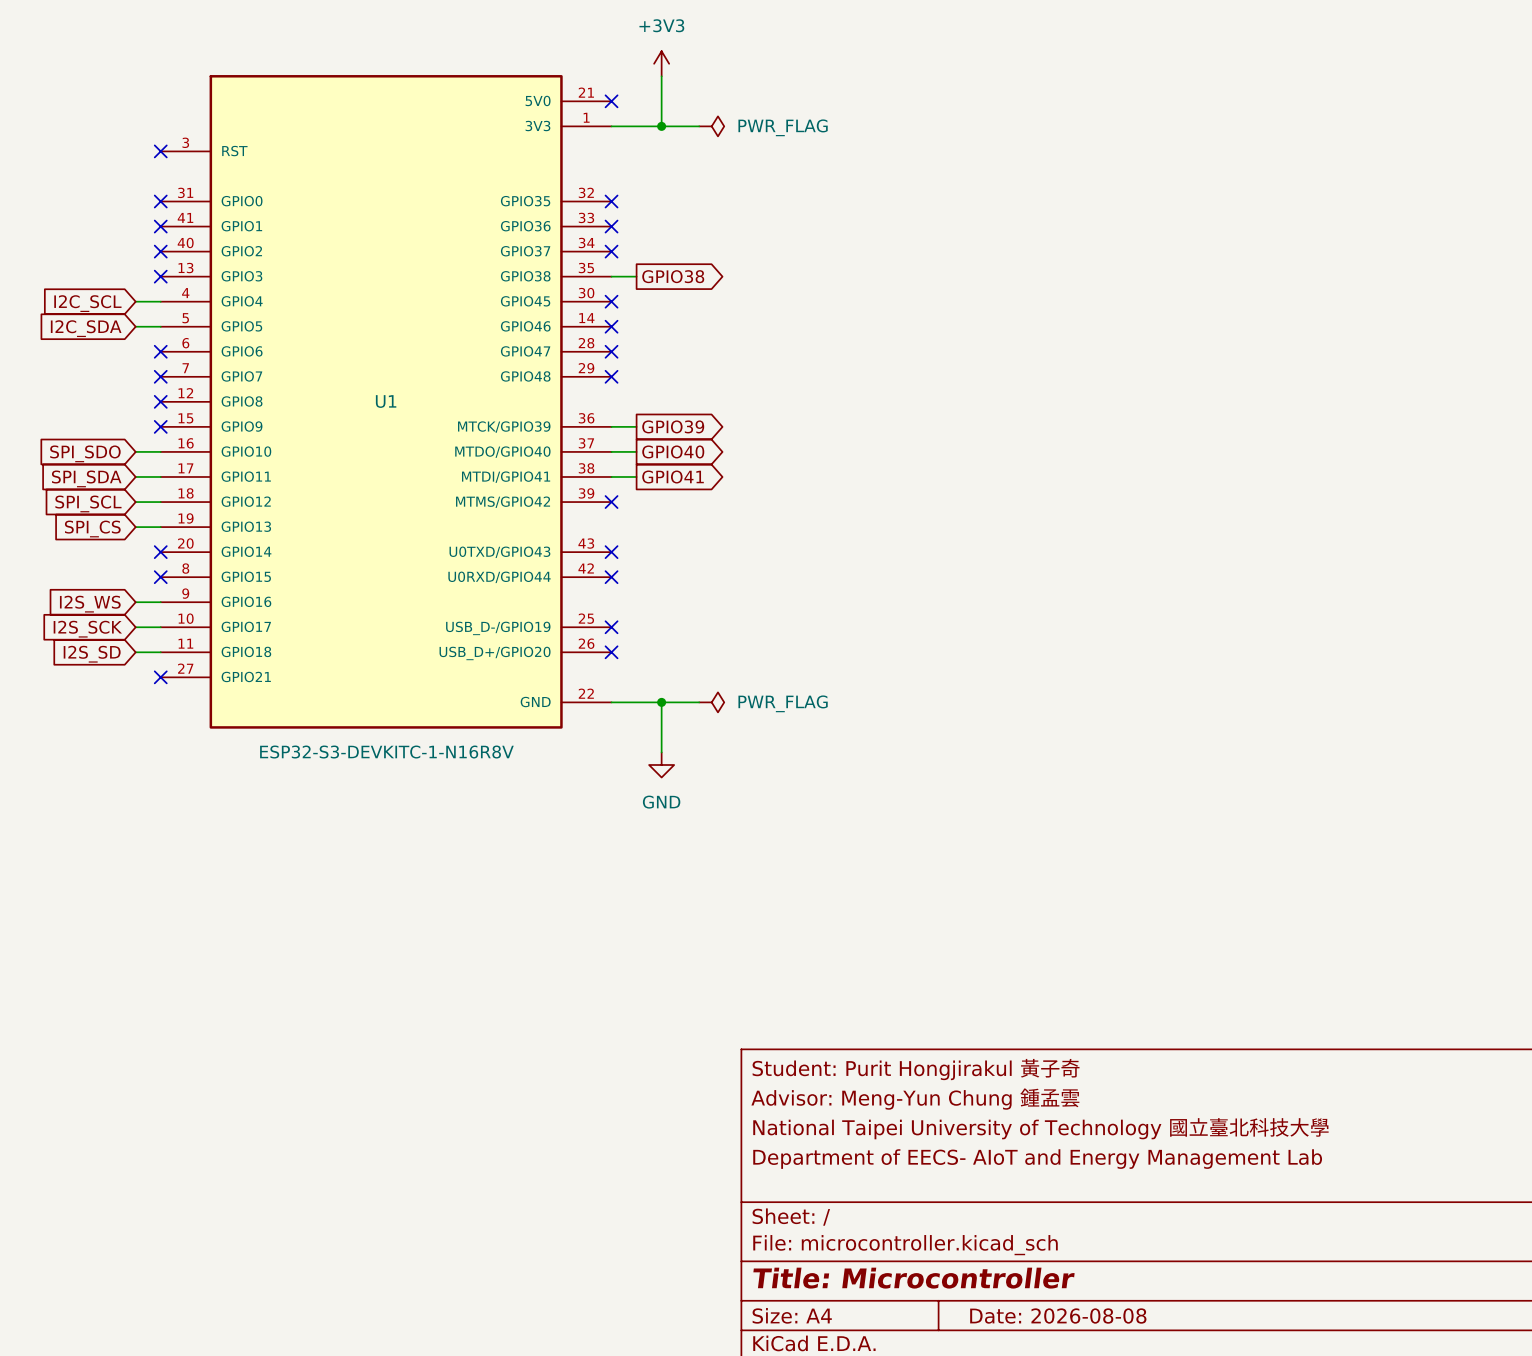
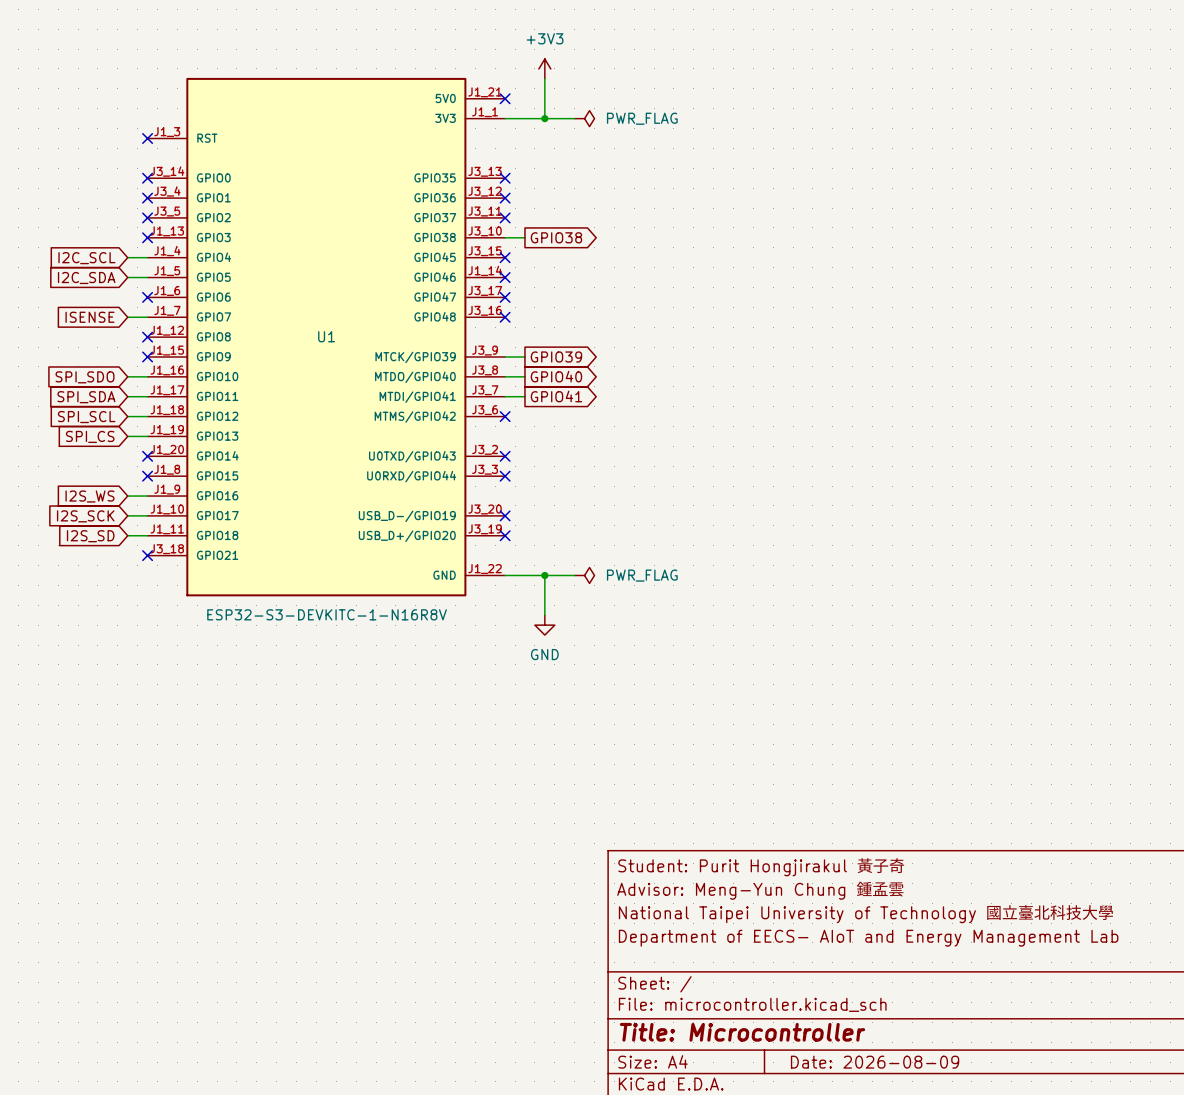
U1 symbol: [160, 75, 612, 729] -> [147, 77, 506, 597]
global label: none -> ISENSE (89, 317)
wire: none -> (127, 317) (147, 317)
no-connect mark: (160, 376) -> none
title block: Date: 2026-08-08 (1058, 1316) -> Date: 2026-08-09 (875, 1062)

